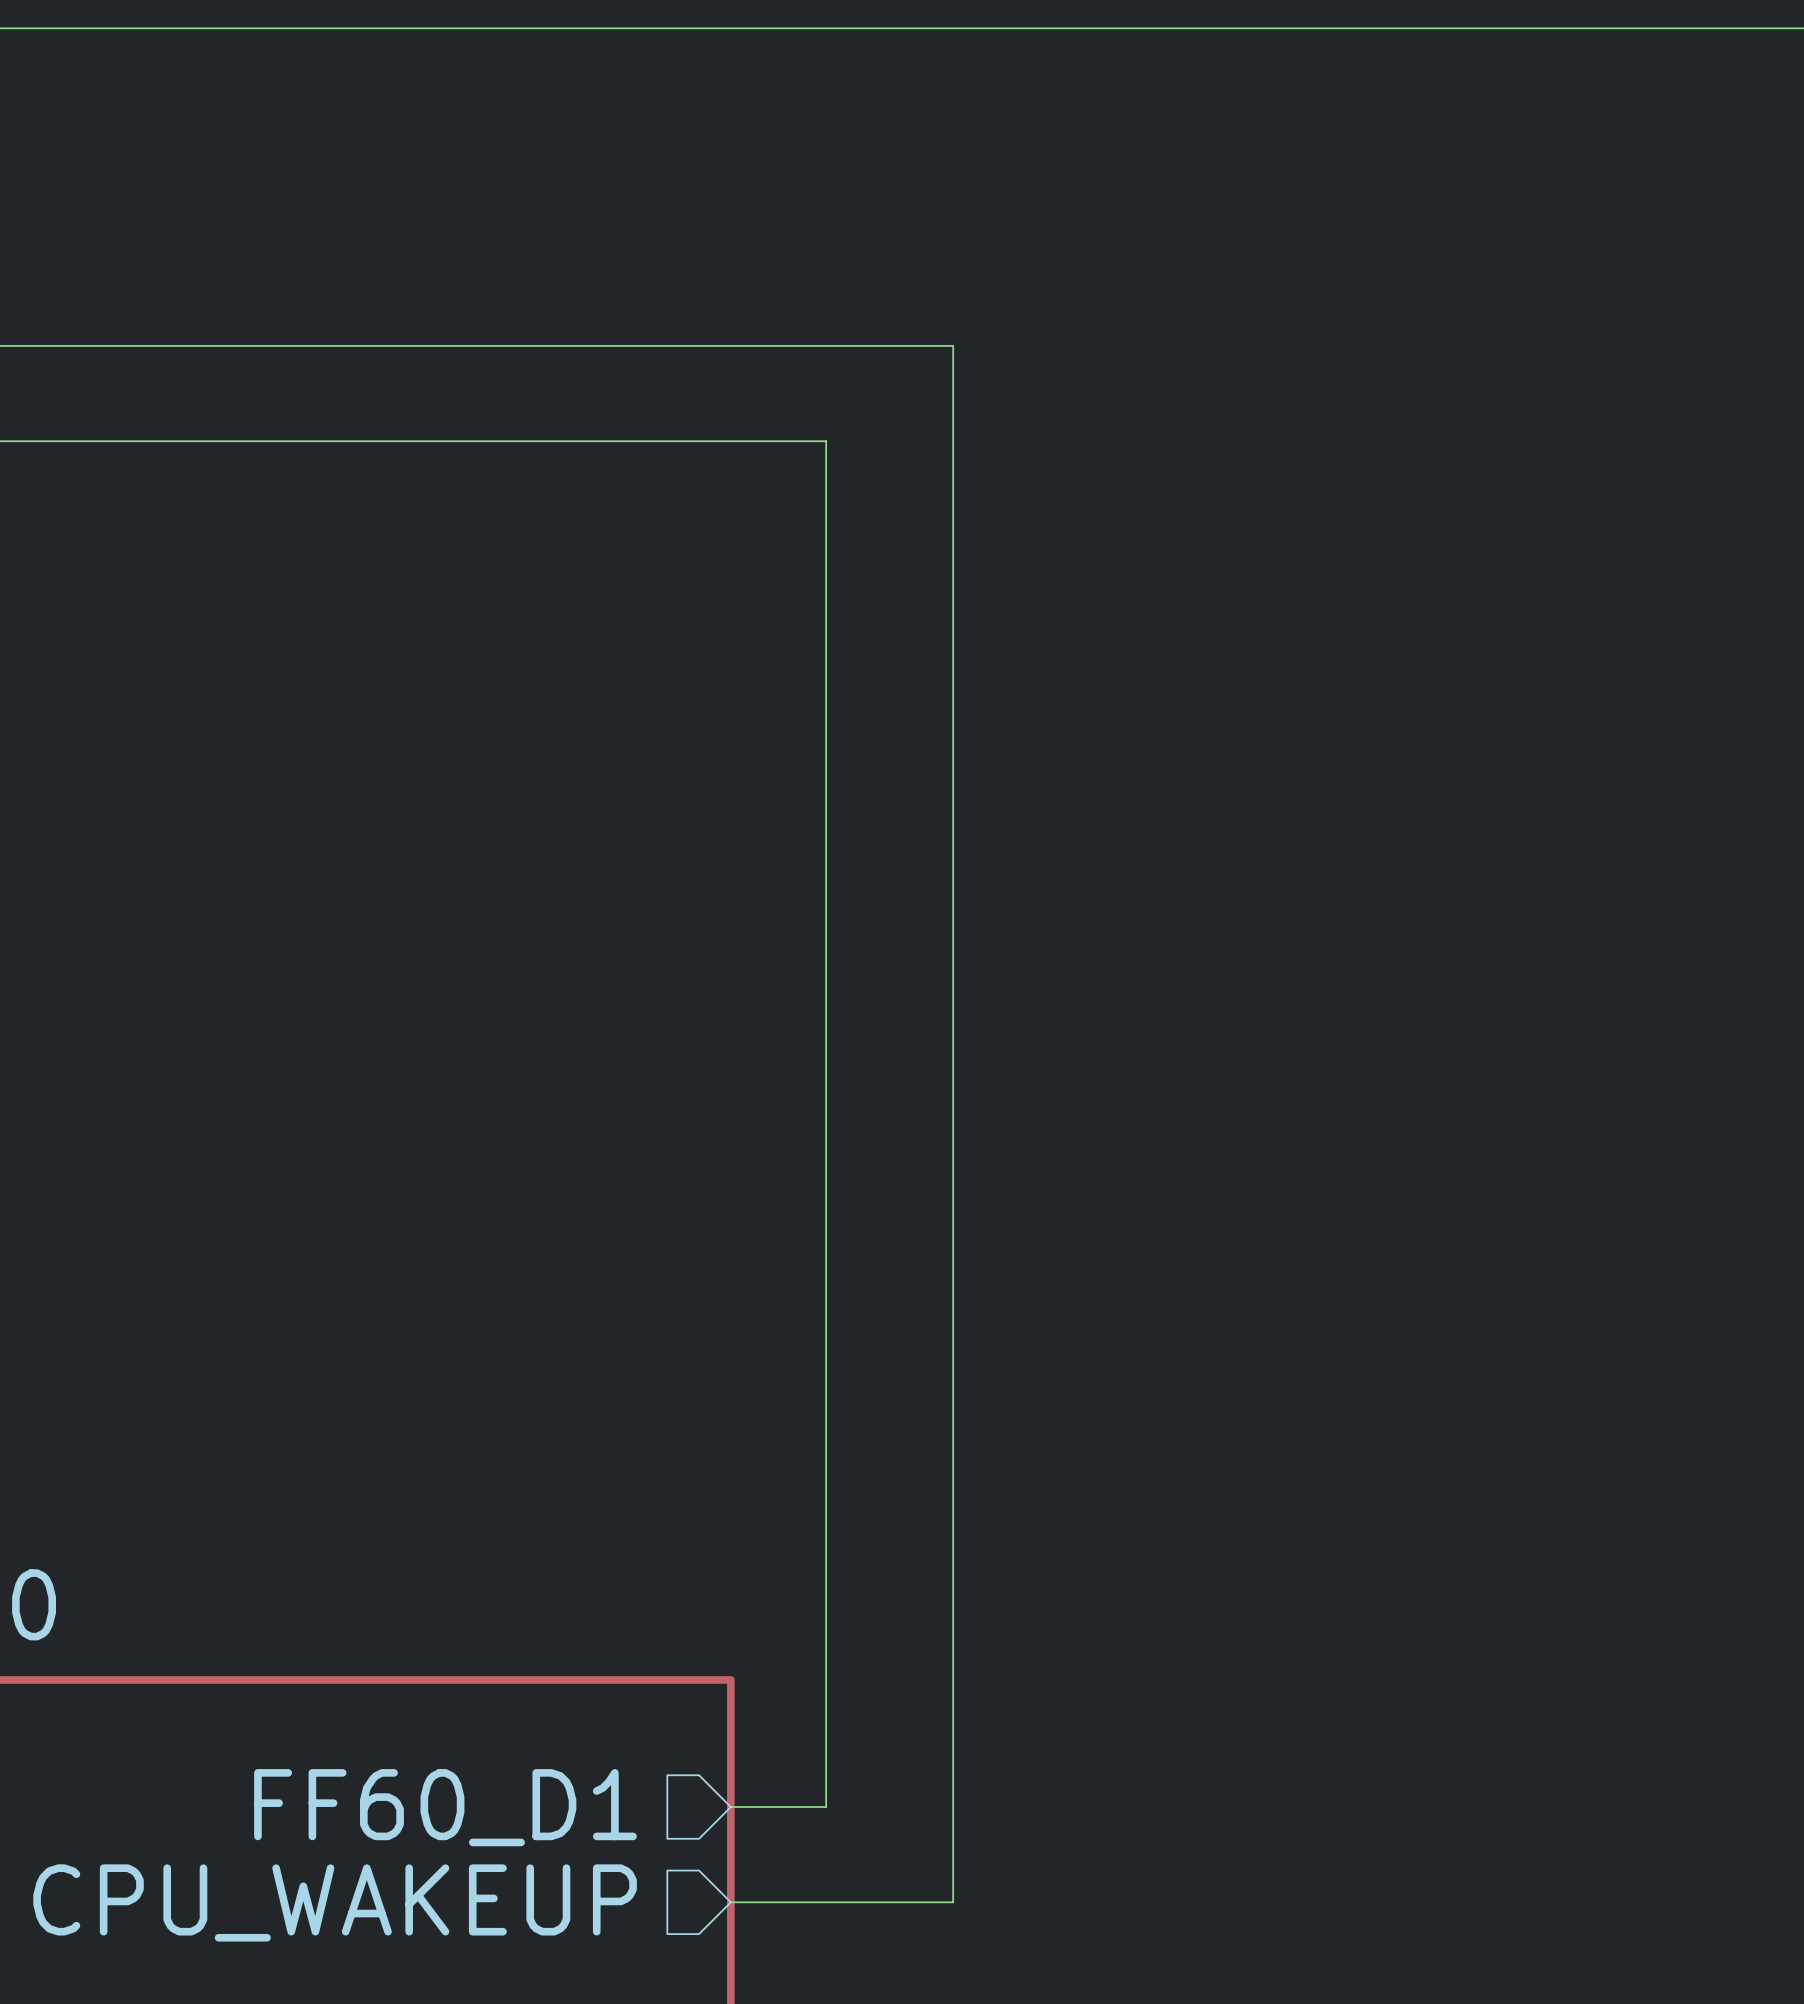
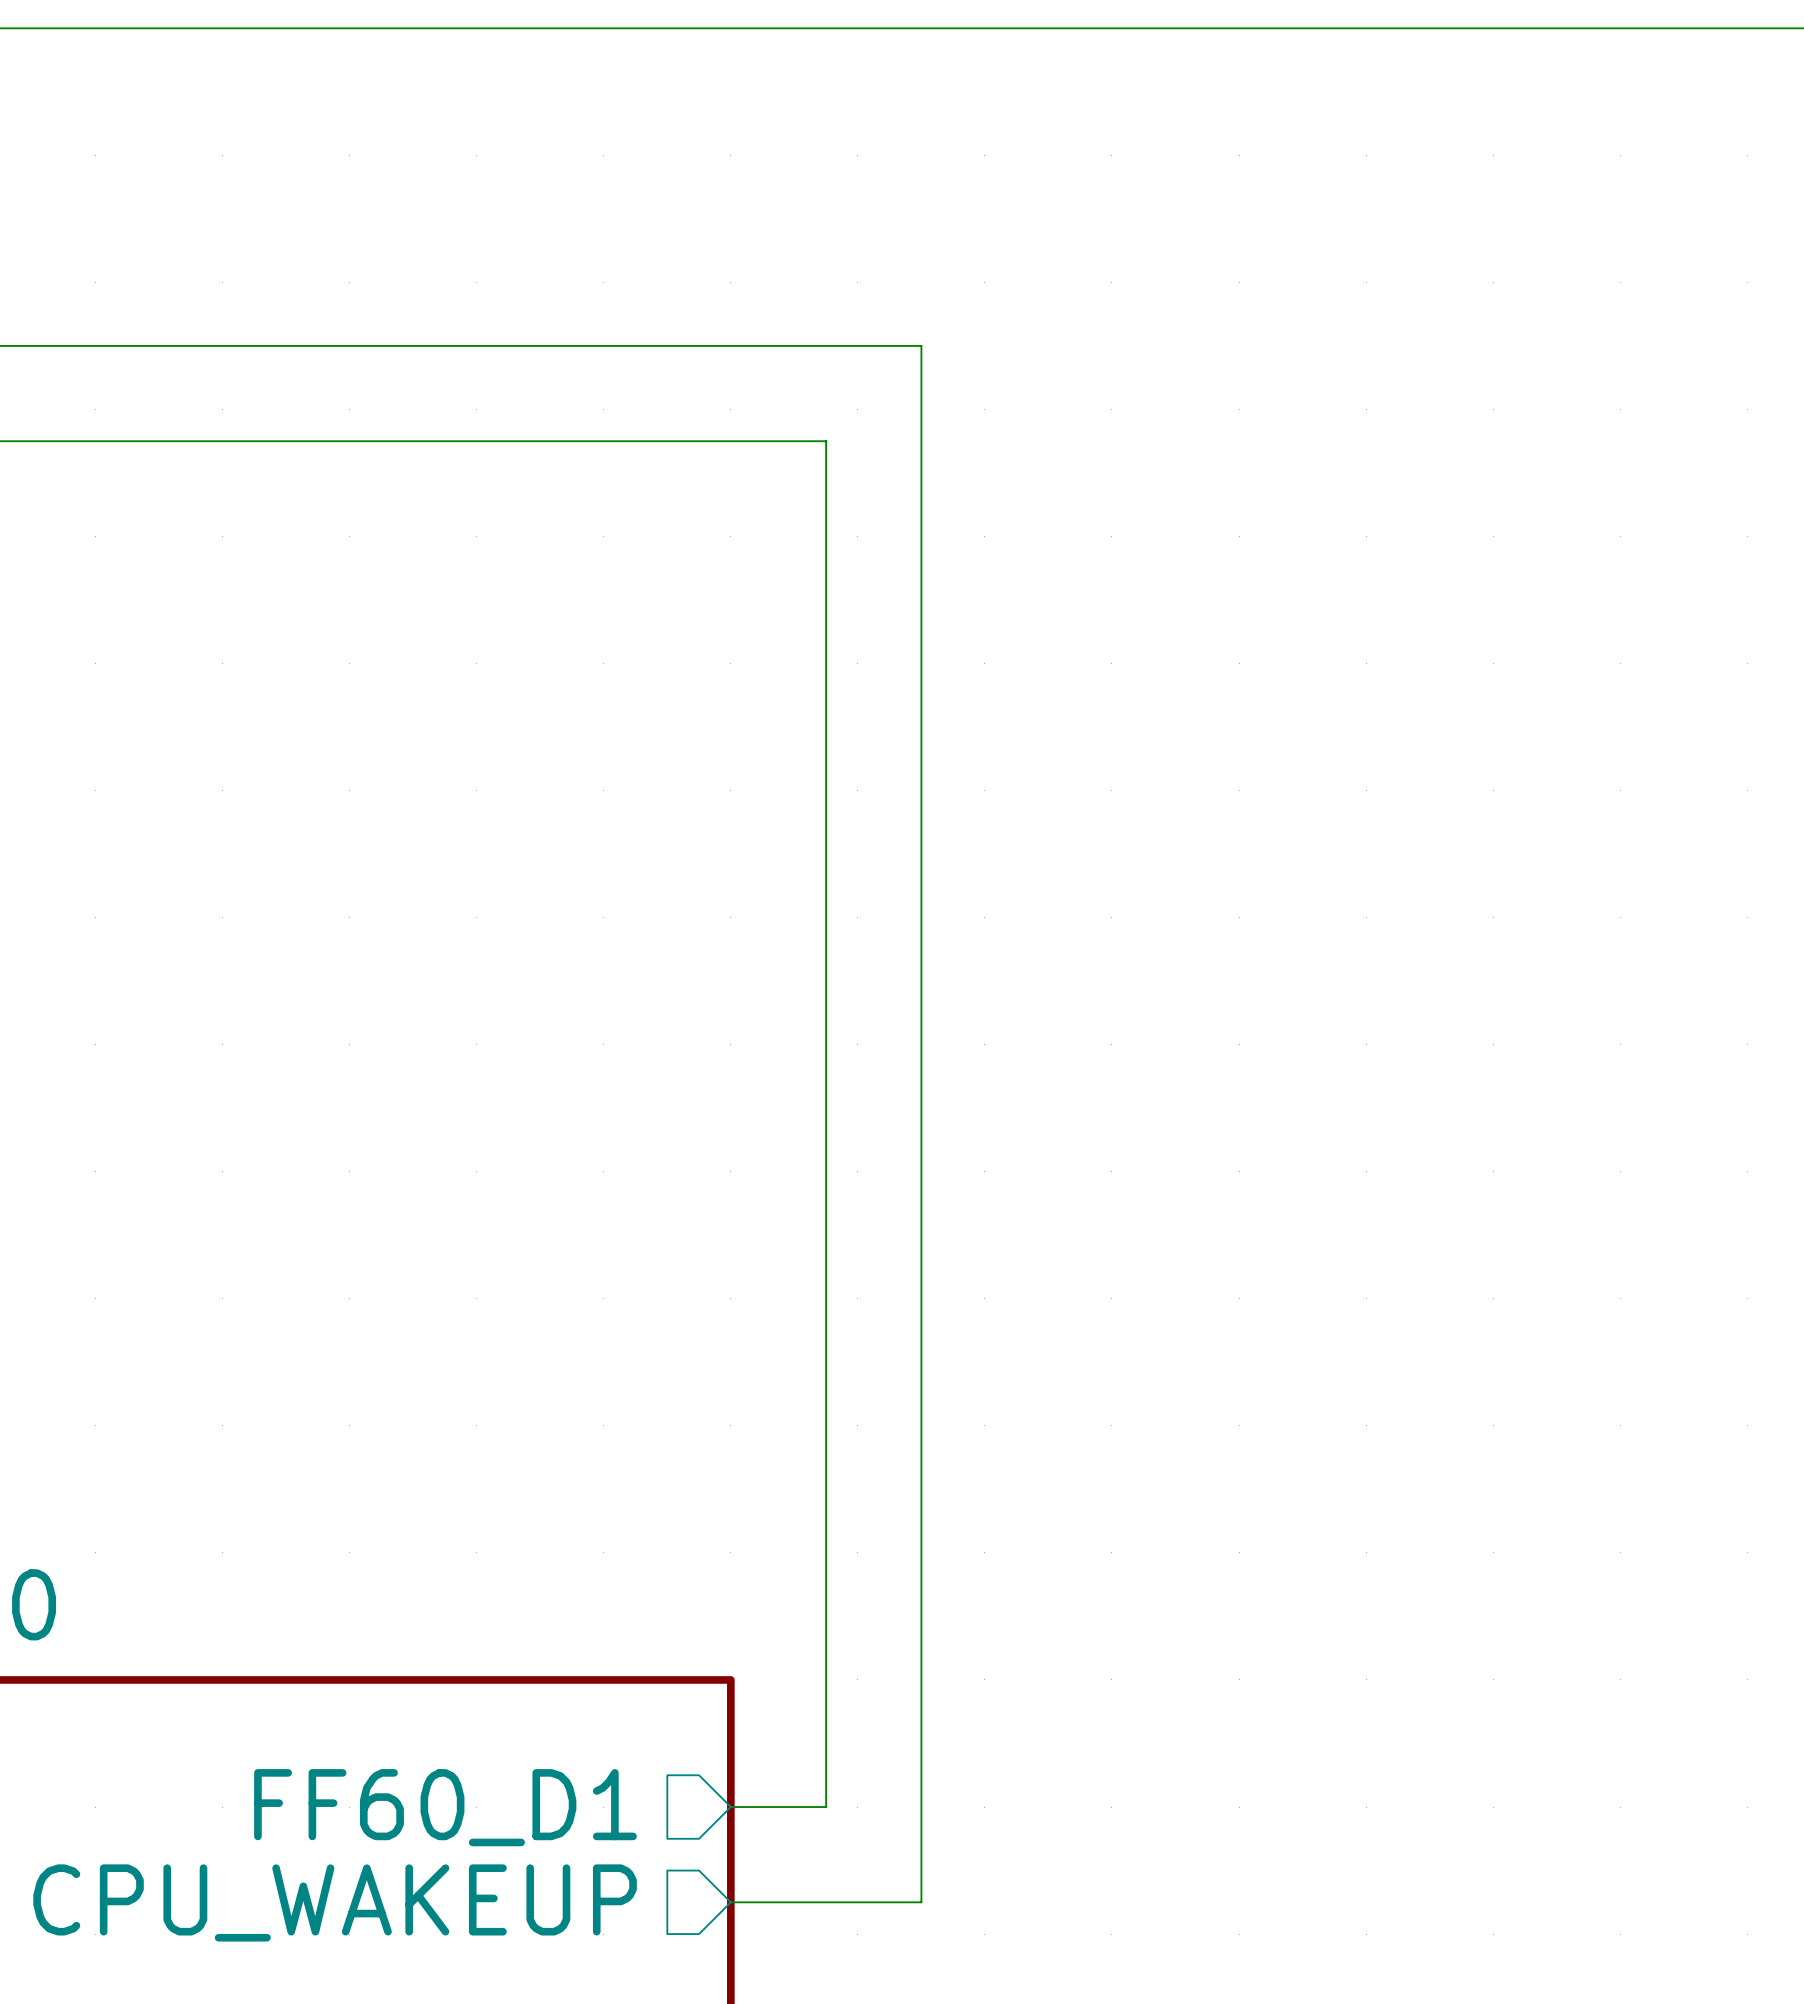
wire: (921, 345) (953, 345) (953, 1902) (921, 1902) -> (921, 345) (921, 1902)

